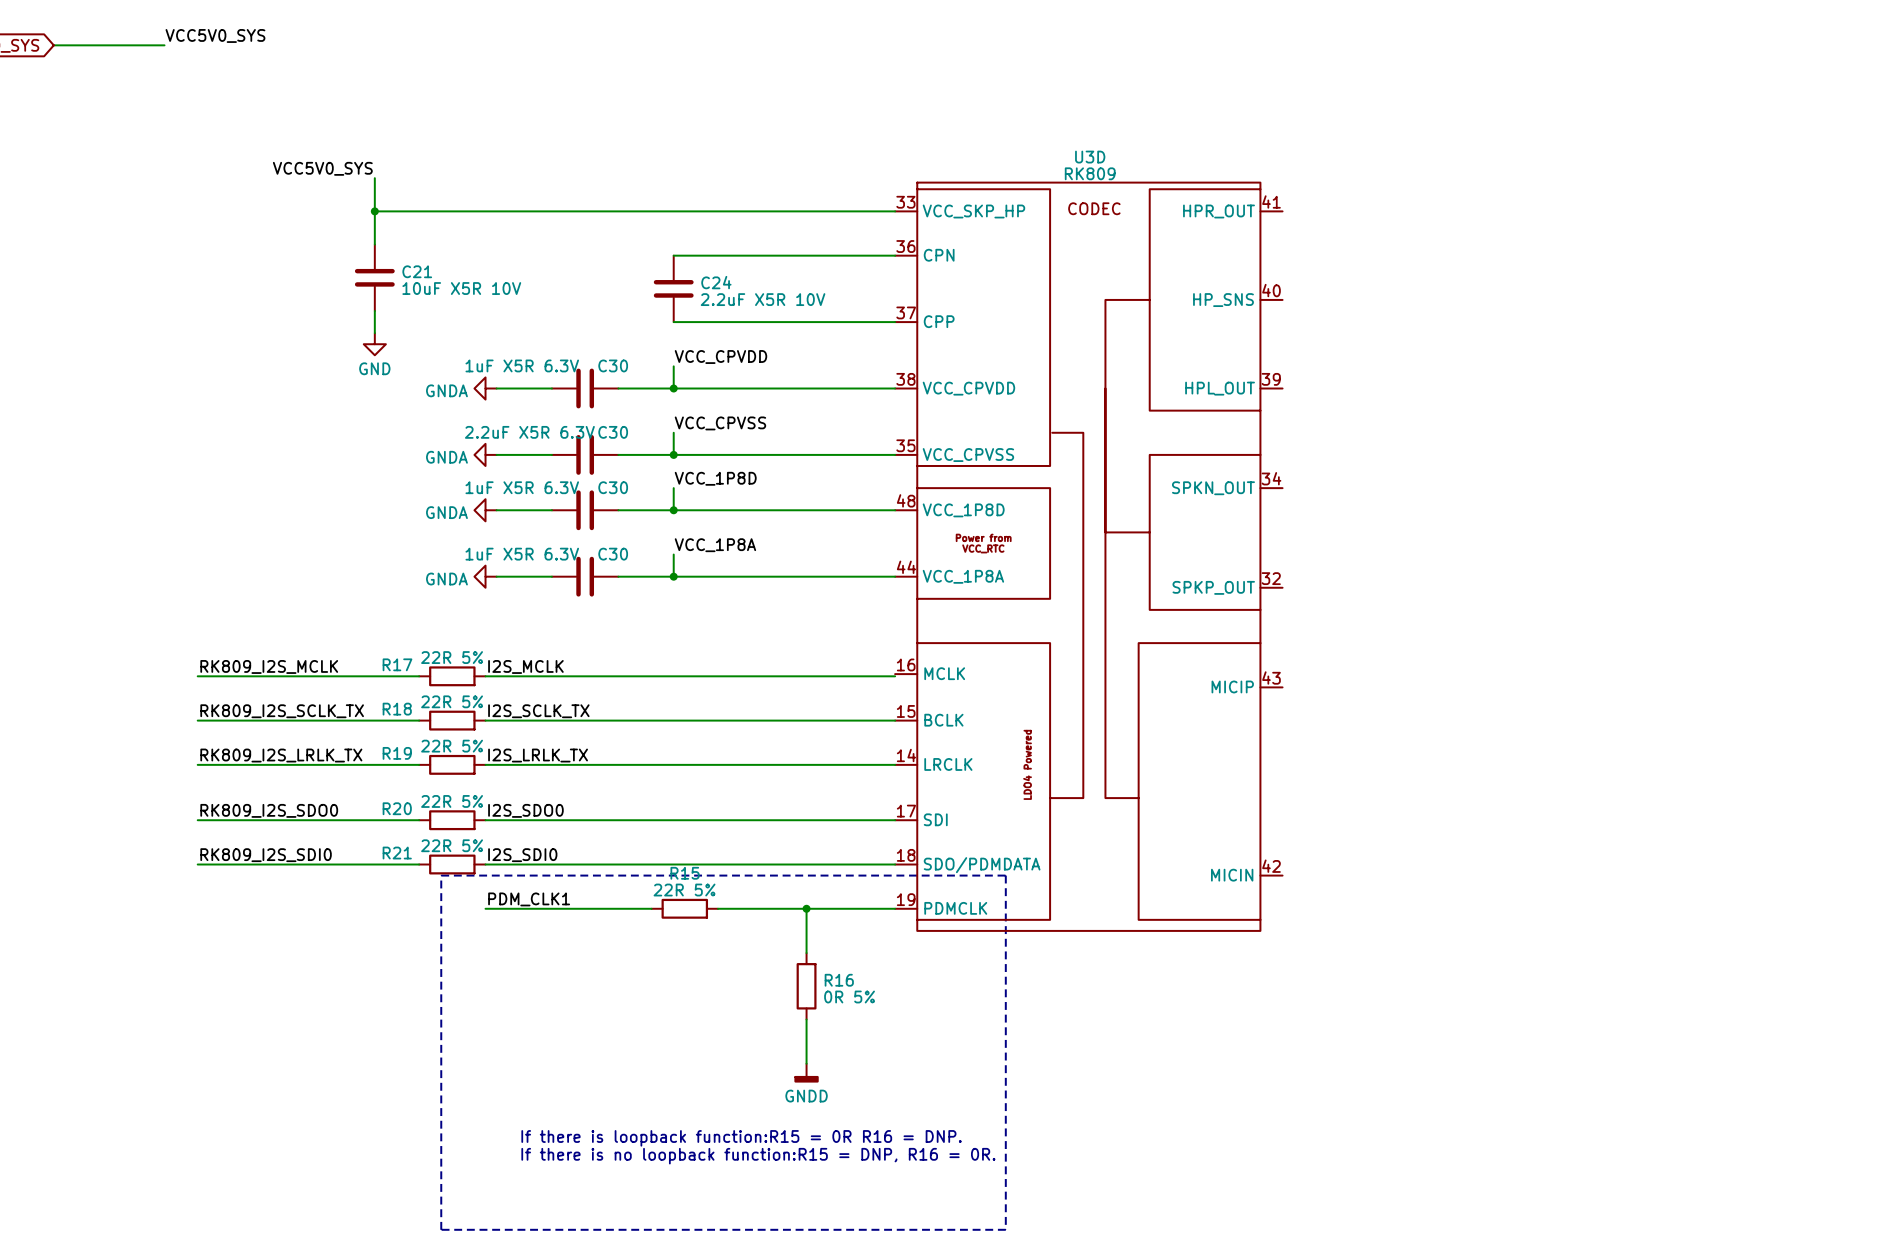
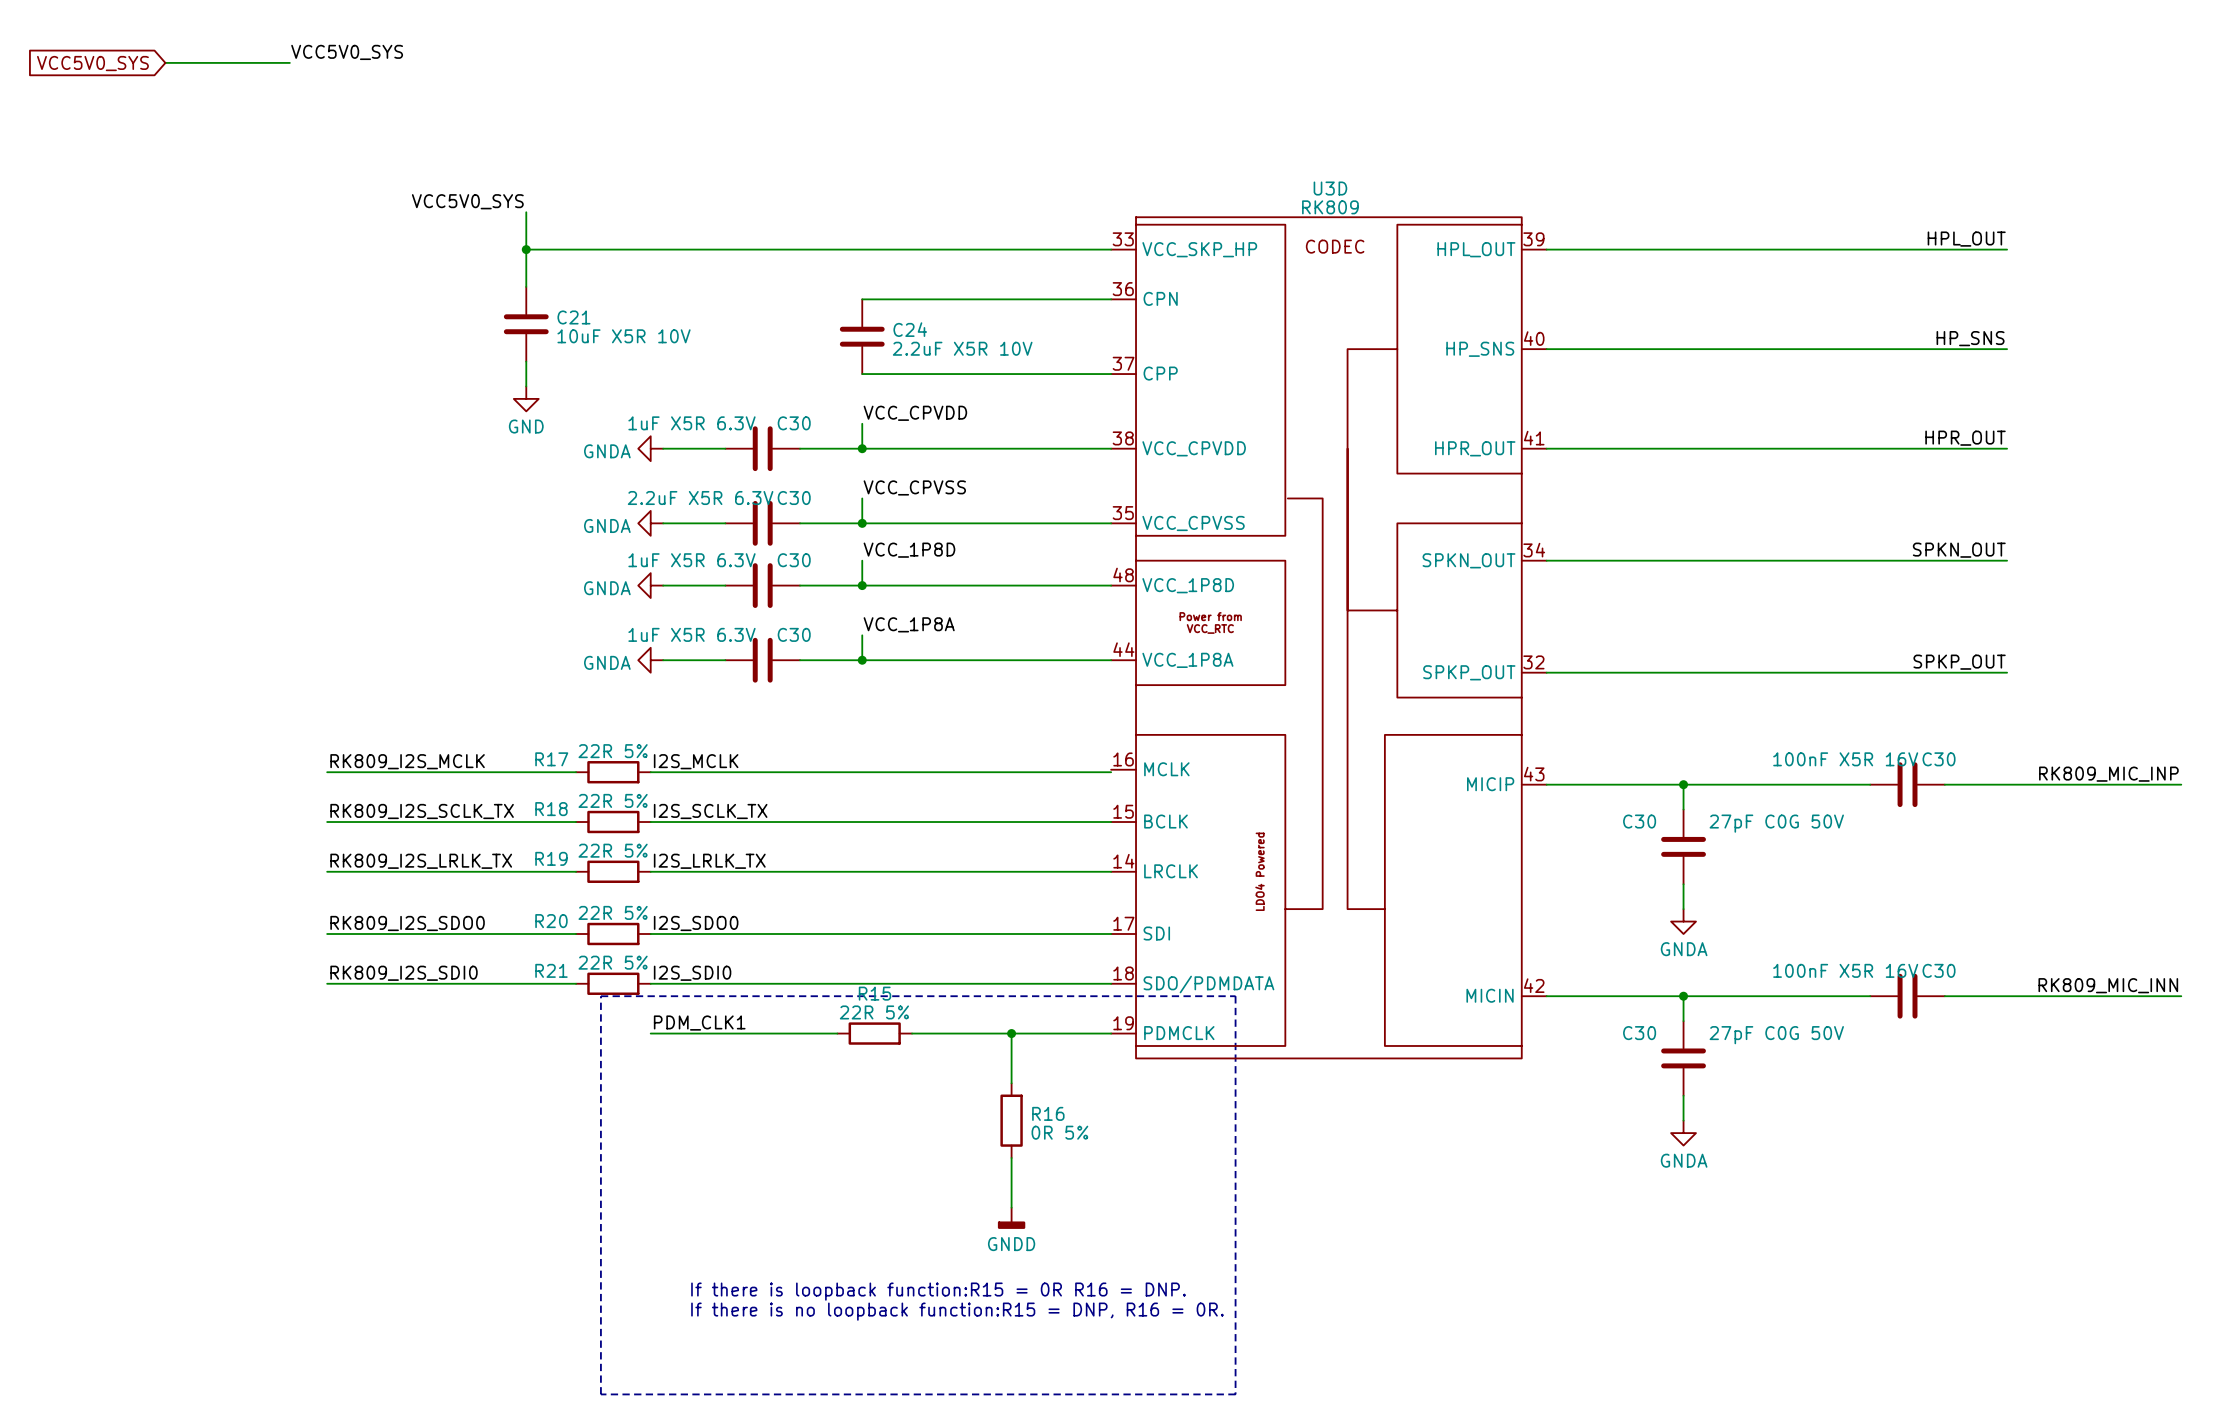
U3D pin number: 41 (1271, 201) -> 39 (1533, 239)
label: none -> HPL_OUT (1966, 239)
U3D pin name: HPR_OUT (1219, 211) -> HPL_OUT (1476, 249)
wire: none -> (1546, 249) (2007, 249)
label: none -> HP_SNS (1970, 338)
wire: none -> (1546, 349) (2007, 349)
U3D pin number: 39 (1271, 379) -> 41 (1534, 438)
label: none -> HPR_OUT (1965, 438)
U3D pin name: HPL_OUT (1220, 388) -> HPR_OUT (1475, 448)
wire: none -> (1546, 448) (2007, 448)
label: none -> SPKN_OUT (1959, 550)
wire: none -> (1546, 560) (2007, 560)
label: none -> SPKP_OUT (1959, 662)
wire: none -> (1546, 672) (2007, 672)
label: none -> RK809_MIC_INP (2108, 774)
wire: none -> (1546, 784) (1870, 784)
wire: none -> (1683, 784) (1683, 809)
junction: none -> (1683, 784)
C30: none -> 100nF X5R 16V (1907, 784)
wire: none -> (1944, 784) (2181, 784)
C30: none -> 27pF C0G 50V (1683, 846)
wire: none -> (1683, 884) (1683, 909)
power symbol: none -> GNDA (1683, 921)
label: none -> RK809_MIC_INN (2108, 985)
wire: none -> (1546, 996) (1870, 996)
wire: none -> (1683, 996) (1683, 1021)
junction: none -> (1683, 996)
C30: none -> 100nF X5R 16V (1907, 996)
wire: none -> (1944, 996) (2181, 996)
C30: none -> 27pF C0G 50V (1683, 1058)
wire: none -> (1683, 1095) (1683, 1120)
power symbol: none -> GNDA (1683, 1133)

